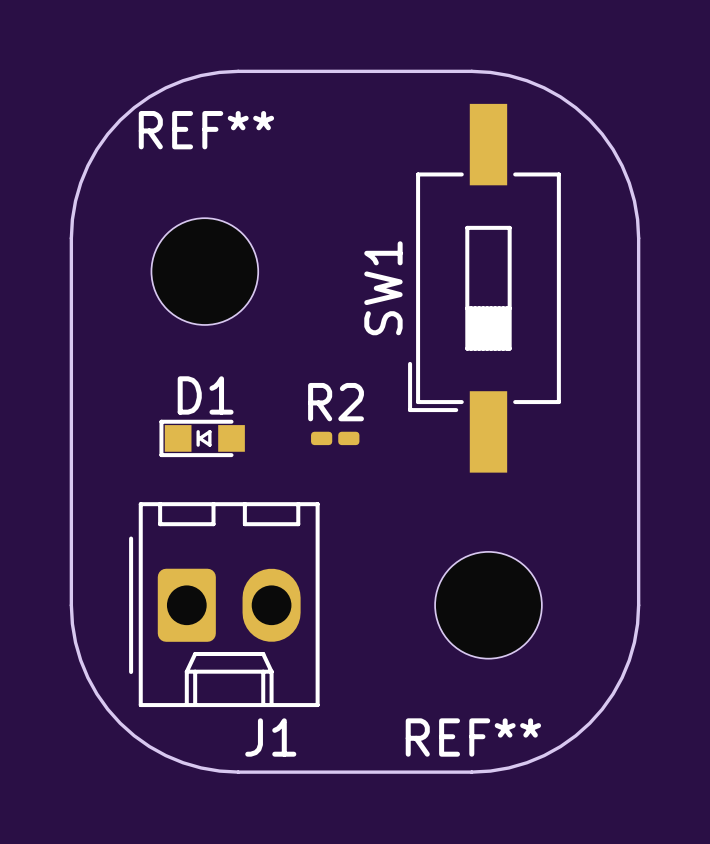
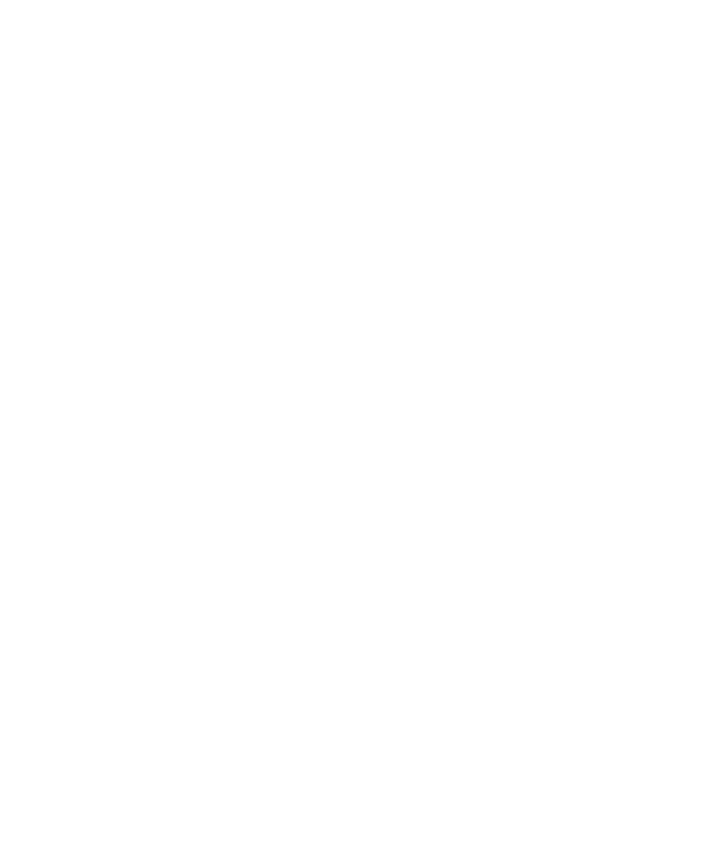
board edge: (238, 71) (471, 71) (508, 75) (544, 87) (575, 107) (602, 134) (622, 165) (634, 201) (638, 238) (637, 623) (629, 660) (613, 694) (589, 723) (575, 735) (544, 755) (508, 767) (471, 772) (238, 772) (201, 767) (165, 755) (134, 735) (107, 709) (87, 677) (75, 642) (71, 605) (71, 238) (75, 201) (80, 183) (96, 149) (107, 134) (134, 107) (165, 87) (183, 80) (201, 75) (238, 71) -> none
REF**: (204, 271) -> none
SW1: (484, 288) -> none
D1: (202, 438) -> none
R2: (335, 438) -> none
J1: (224, 604) -> none
REF**: (488, 605) -> none

